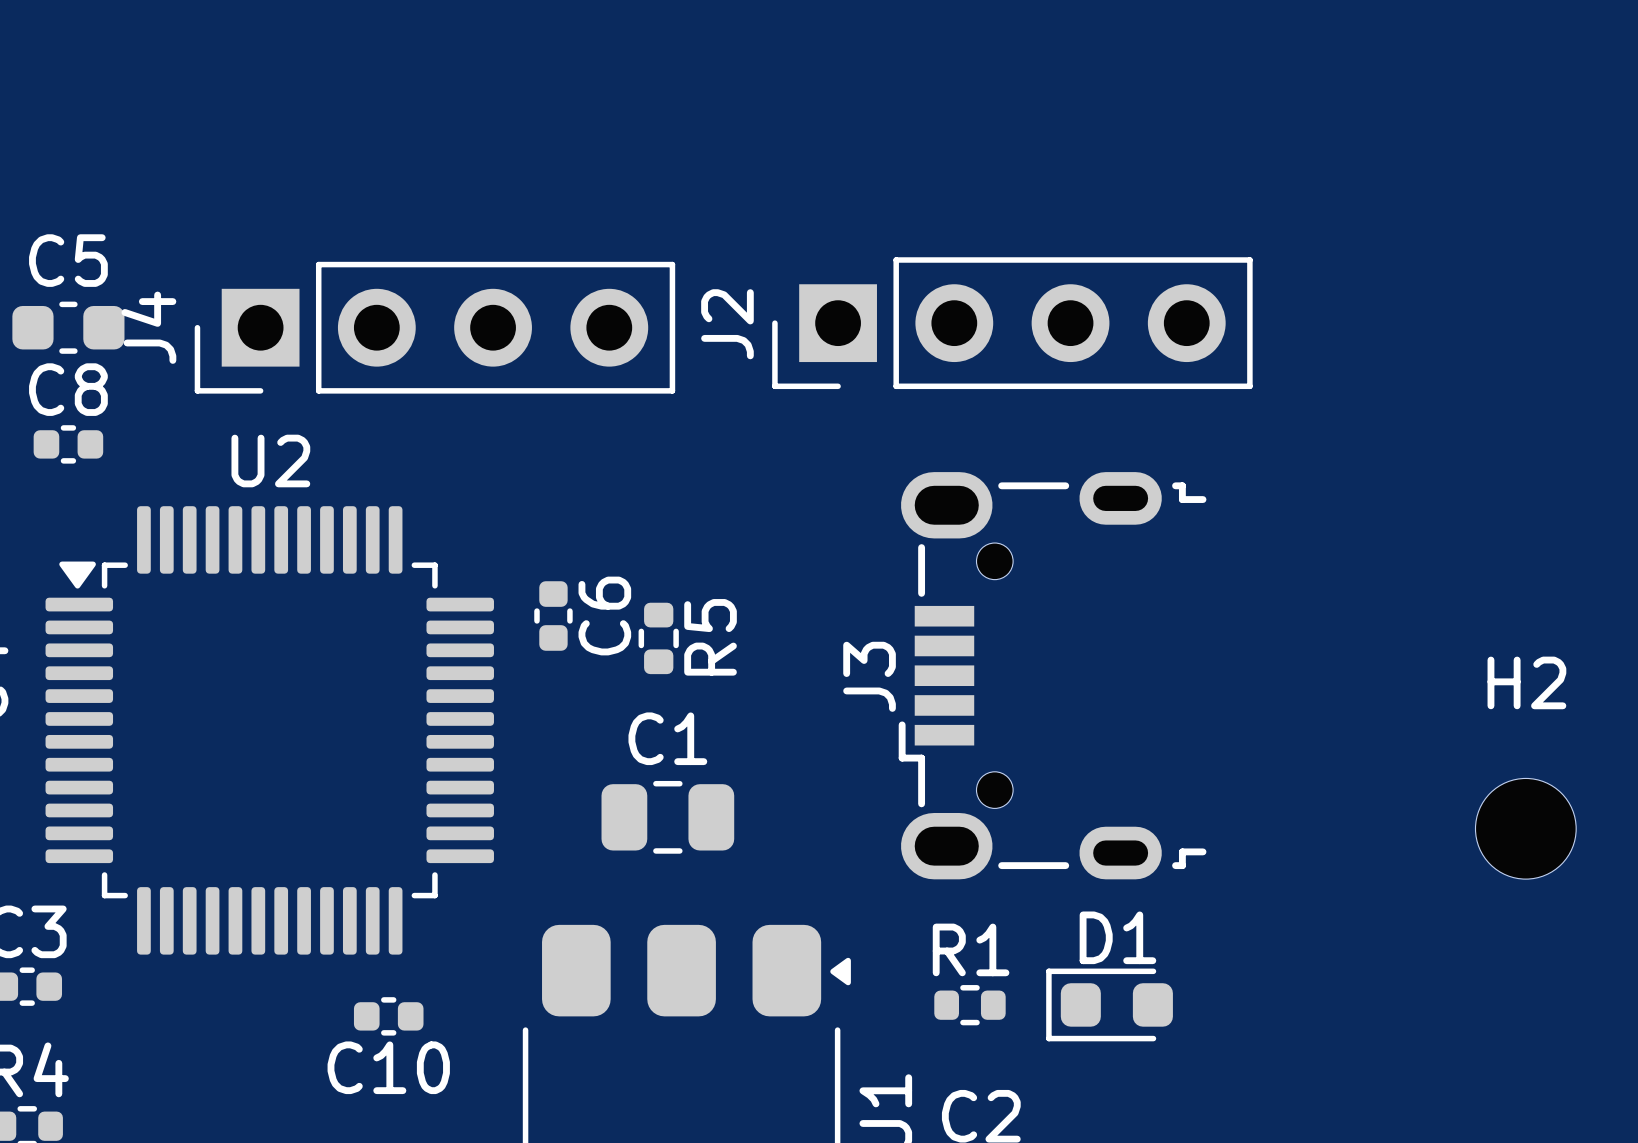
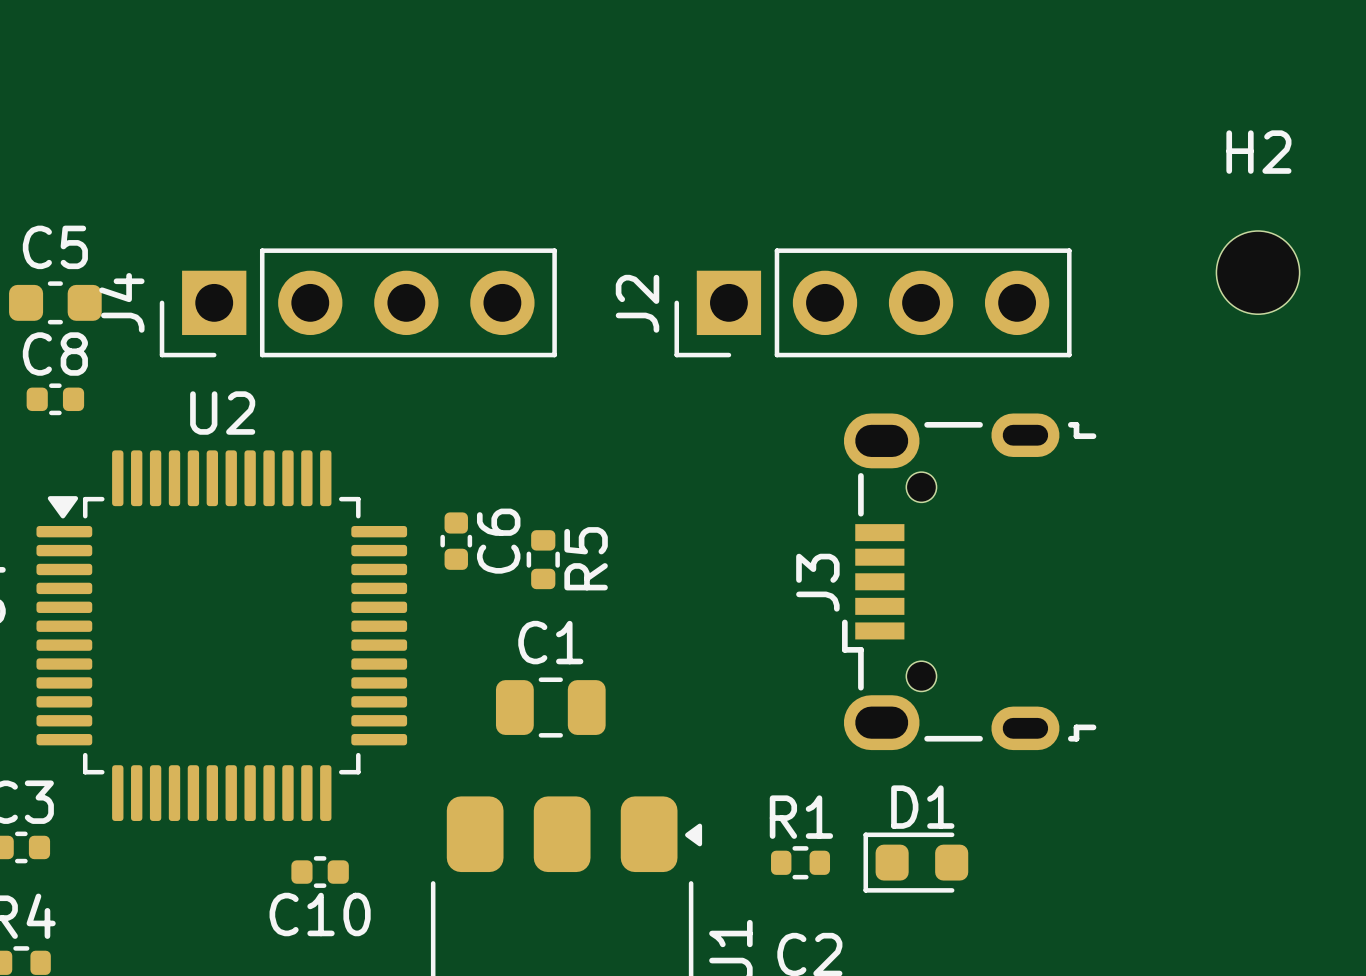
J2 position: (1012, 323) -> (873, 302)
J3 position: (1052, 675) -> (969, 581)
H2 position: (1525, 828) -> (1258, 272)

